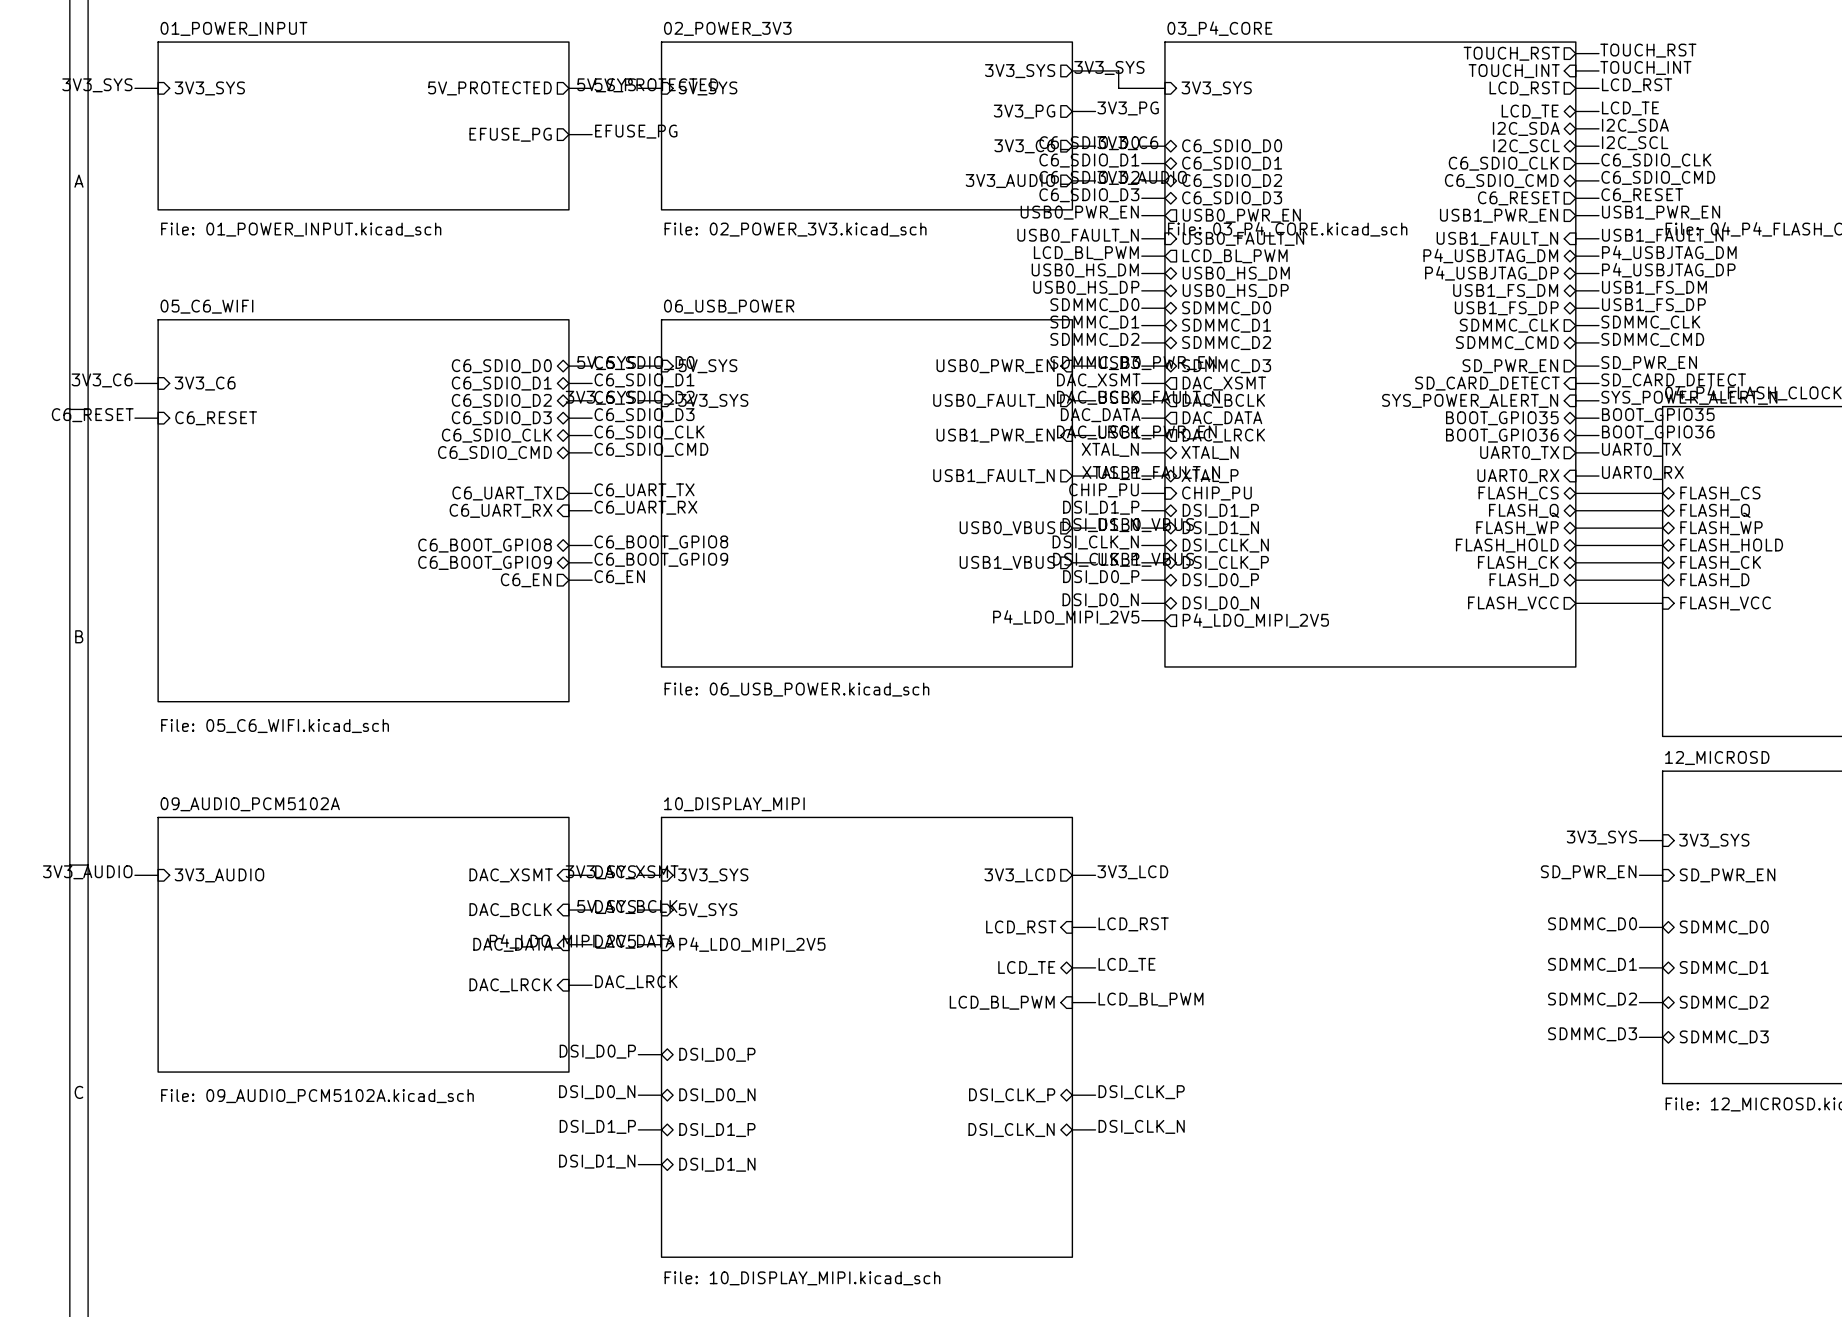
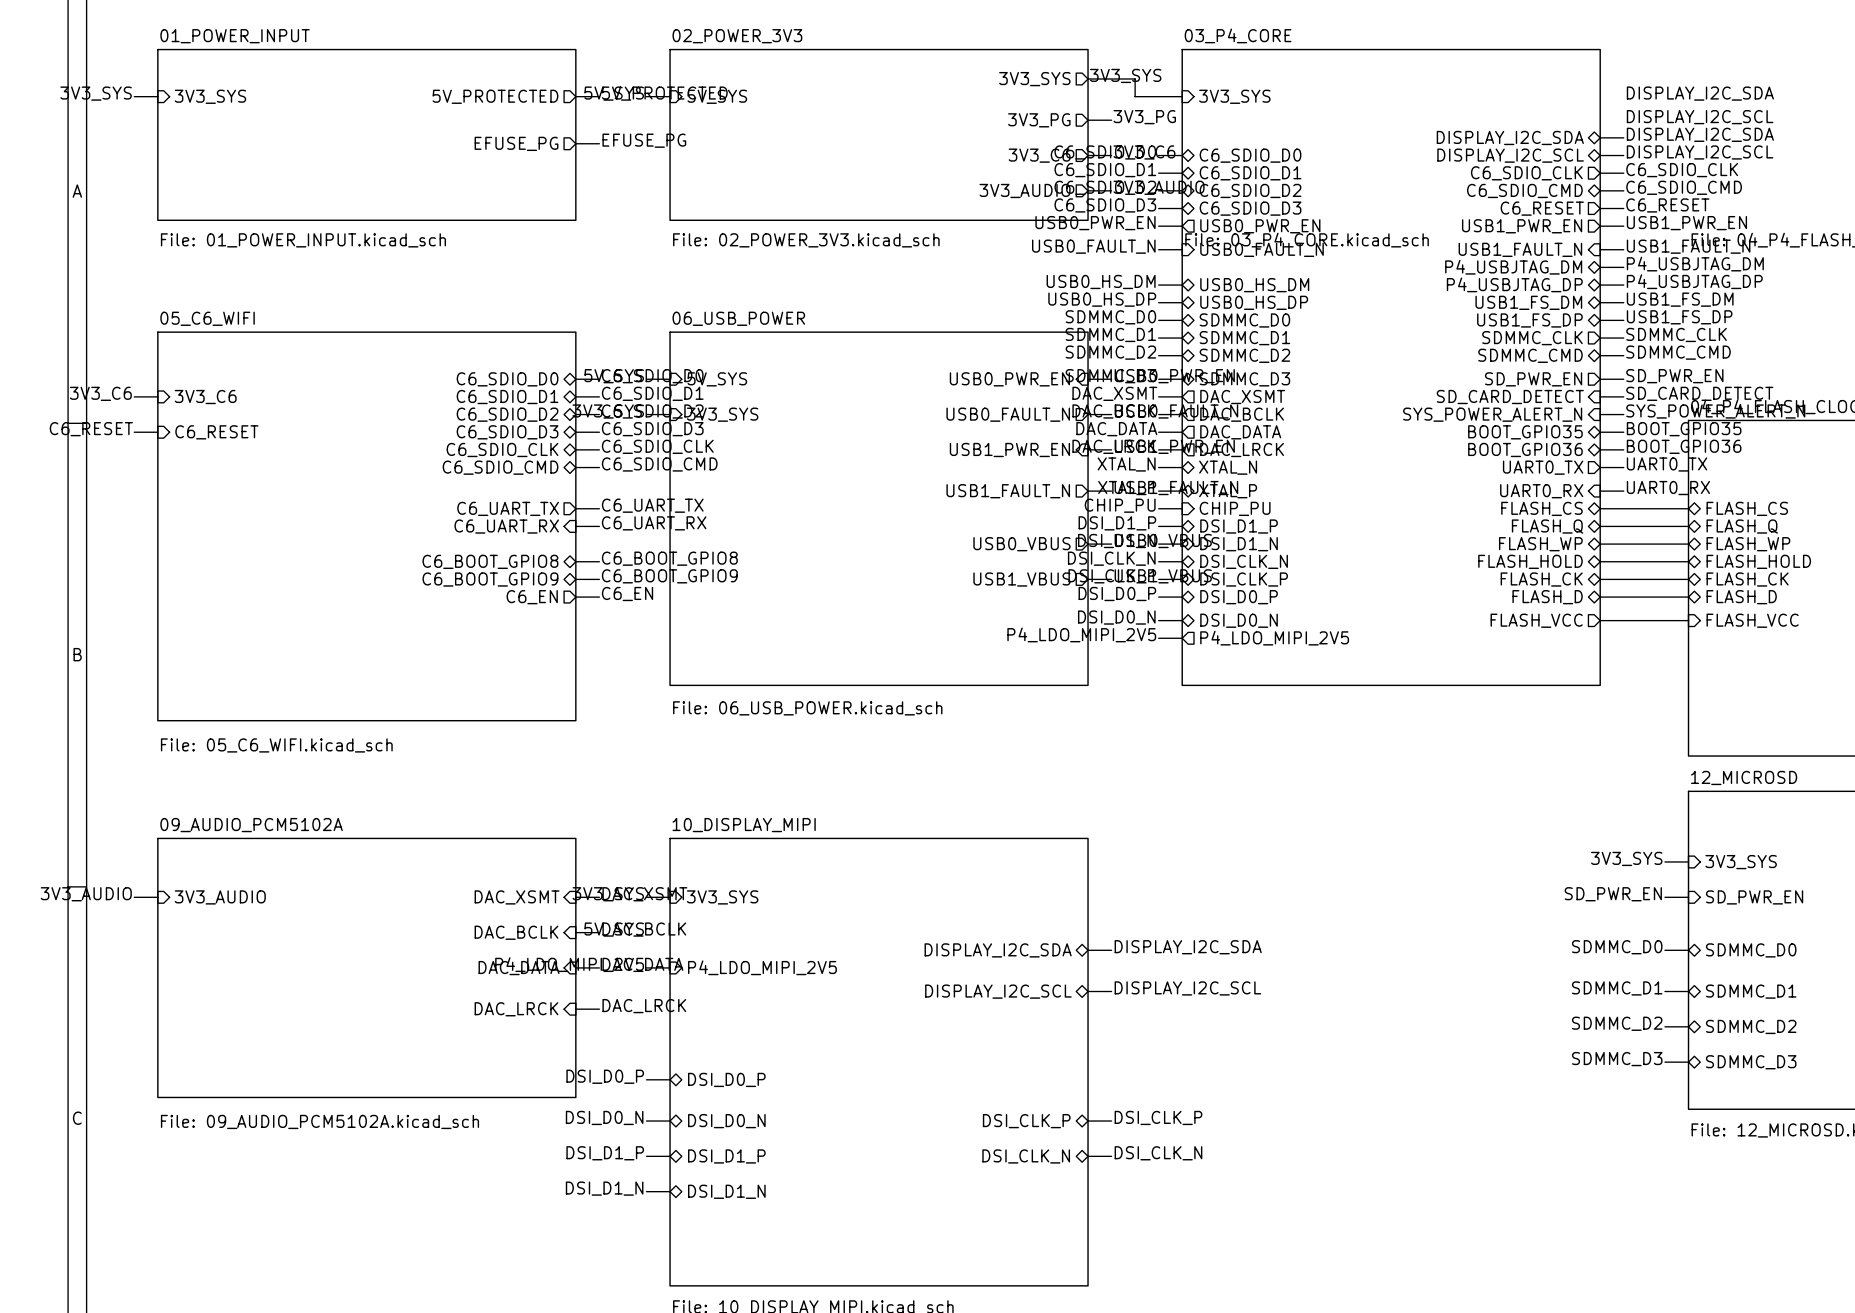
label: TOUCH_RST (1648, 50) -> none
sheet pin: TOUCH_RST (1511, 53) -> none
wire: (1575, 53) (1598, 53) -> none
label: TOUCH_INT (1645, 67) -> none
wire: (1575, 70) (1598, 70) -> none
sheet pin: TOUCH_INT (1514, 71) -> none
label: LCD_RST (1637, 85) -> DISPLAY_I2C_SDA (1700, 93)
sheet pin: LCD_RST (1524, 88) -> none
wire: (1575, 88) (1598, 88) -> none
label: LCD_TE (1630, 108) -> DISPLAY_I2C_SCL (1700, 117)
sheet pin: LCD_TE (1530, 111) -> none
wire: (1575, 111) (1598, 111) -> none
label: I2C_SDA (1635, 125) -> DISPLAY_I2C_SDA (1700, 134)
sheet pin: I2C_SDA (1526, 128) -> DISPLAY_I2C_SDA (1510, 137)
label: I2C_SCL (1635, 143) -> DISPLAY_I2C_SCL (1700, 152)
sheet pin: I2C_SCL (1526, 146) -> DISPLAY_I2C_SCL (1510, 155)
label: LCD_BL_PWM (1086, 253) -> none
wire: (1141, 256) (1164, 256) -> none
sheet pin: LCD_BL_PWM (1235, 256) -> none
label: 3V3_LCD (1132, 872) -> none
sheet pin: 3V3_LCD (1019, 875) -> none
wire: (1072, 875) (1095, 875) -> none
wire: (638, 910) (661, 910) -> none
sheet pin: 5V_SYS (708, 910) -> none
label: LCD_RST (1133, 924) -> DISPLAY_I2C_SDA (1188, 947)
sheet pin shape: input (1021, 927) -> bidirectional (998, 950)
sheet pin: LCD_RST (1021, 927) -> DISPLAY_I2C_SDA (998, 950)
label: LCD_TE (1127, 964) -> DISPLAY_I2C_SCL (1187, 988)
sheet pin: LCD_TE (1026, 968) -> DISPLAY_I2C_SCL (998, 991)
label: LCD_BL_PWM (1151, 999) -> none
sheet pin: LCD_BL_PWM (1002, 1002) -> none
wire: (1072, 1002) (1095, 1002) -> none

